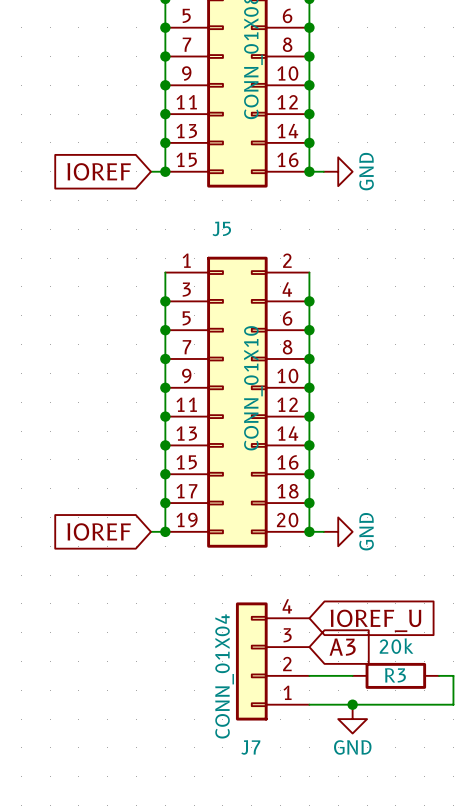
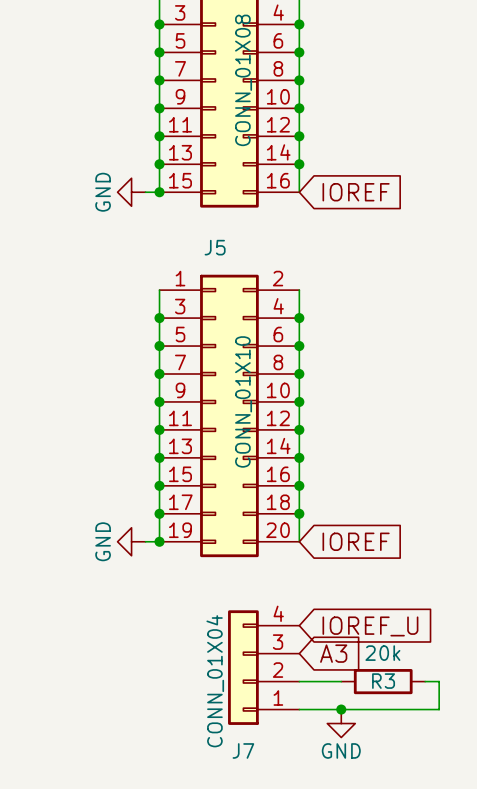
global label rotation: 0° (99, 171) -> 180° (356, 192)
global label position: IOREF (99, 171) -> IOREF (356, 192)
wire: (309, 171) (323, 171) -> none
junction: (309, 171) -> none
power symbol rotation: 0° (338, 171) -> 180° (131, 192)
power symbol position: GND (338, 171) -> GND (131, 192)
global label rotation: 0° (99, 531) -> 180° (356, 541)
global label position: IOREF (99, 531) -> IOREF (356, 541)
wire: (309, 531) (323, 531) -> none
junction: (309, 531) -> none
power symbol rotation: 0° (338, 531) -> 180° (131, 541)
power symbol position: GND (338, 531) -> GND (131, 541)

